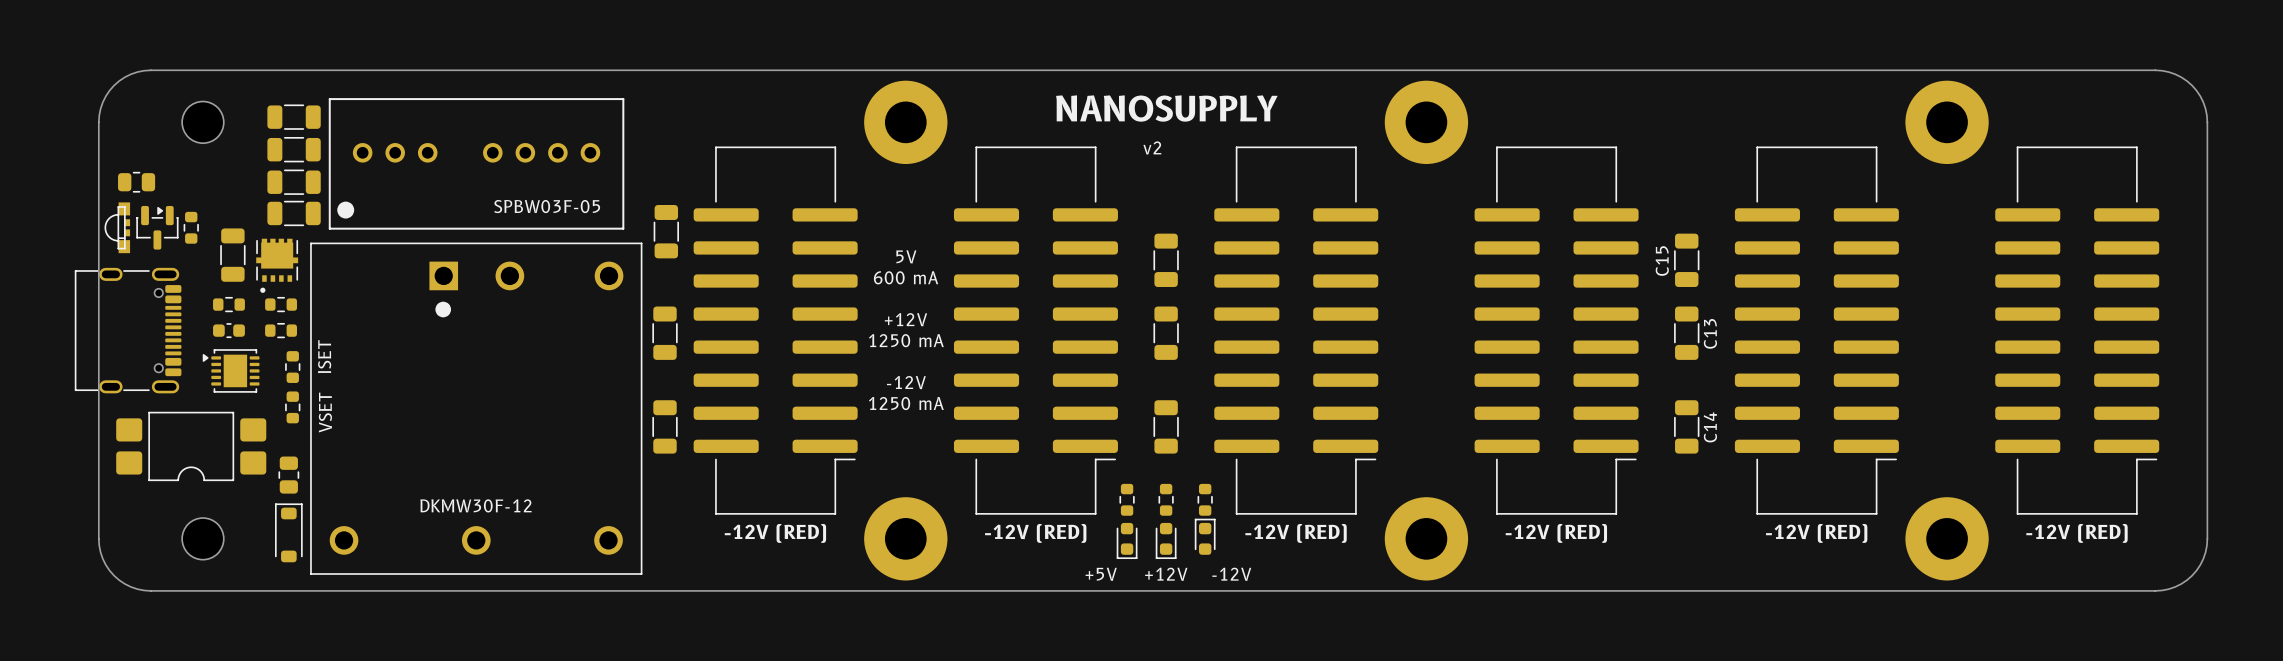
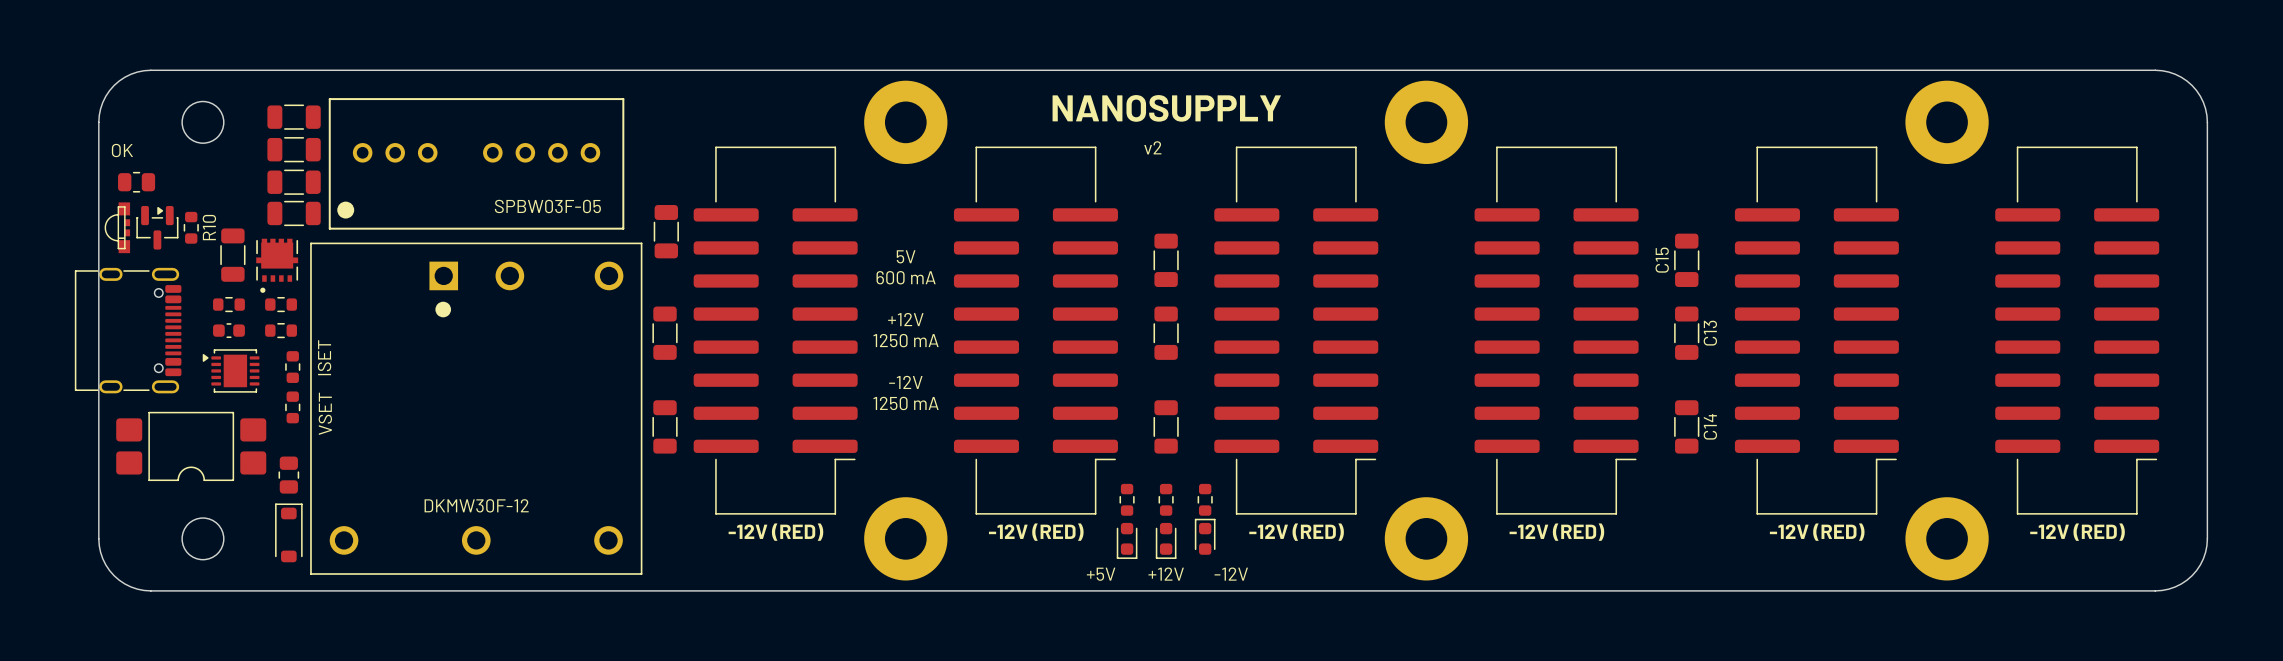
text: none -> OK (122, 150)
R10 name: none -> R10 (209, 227)

